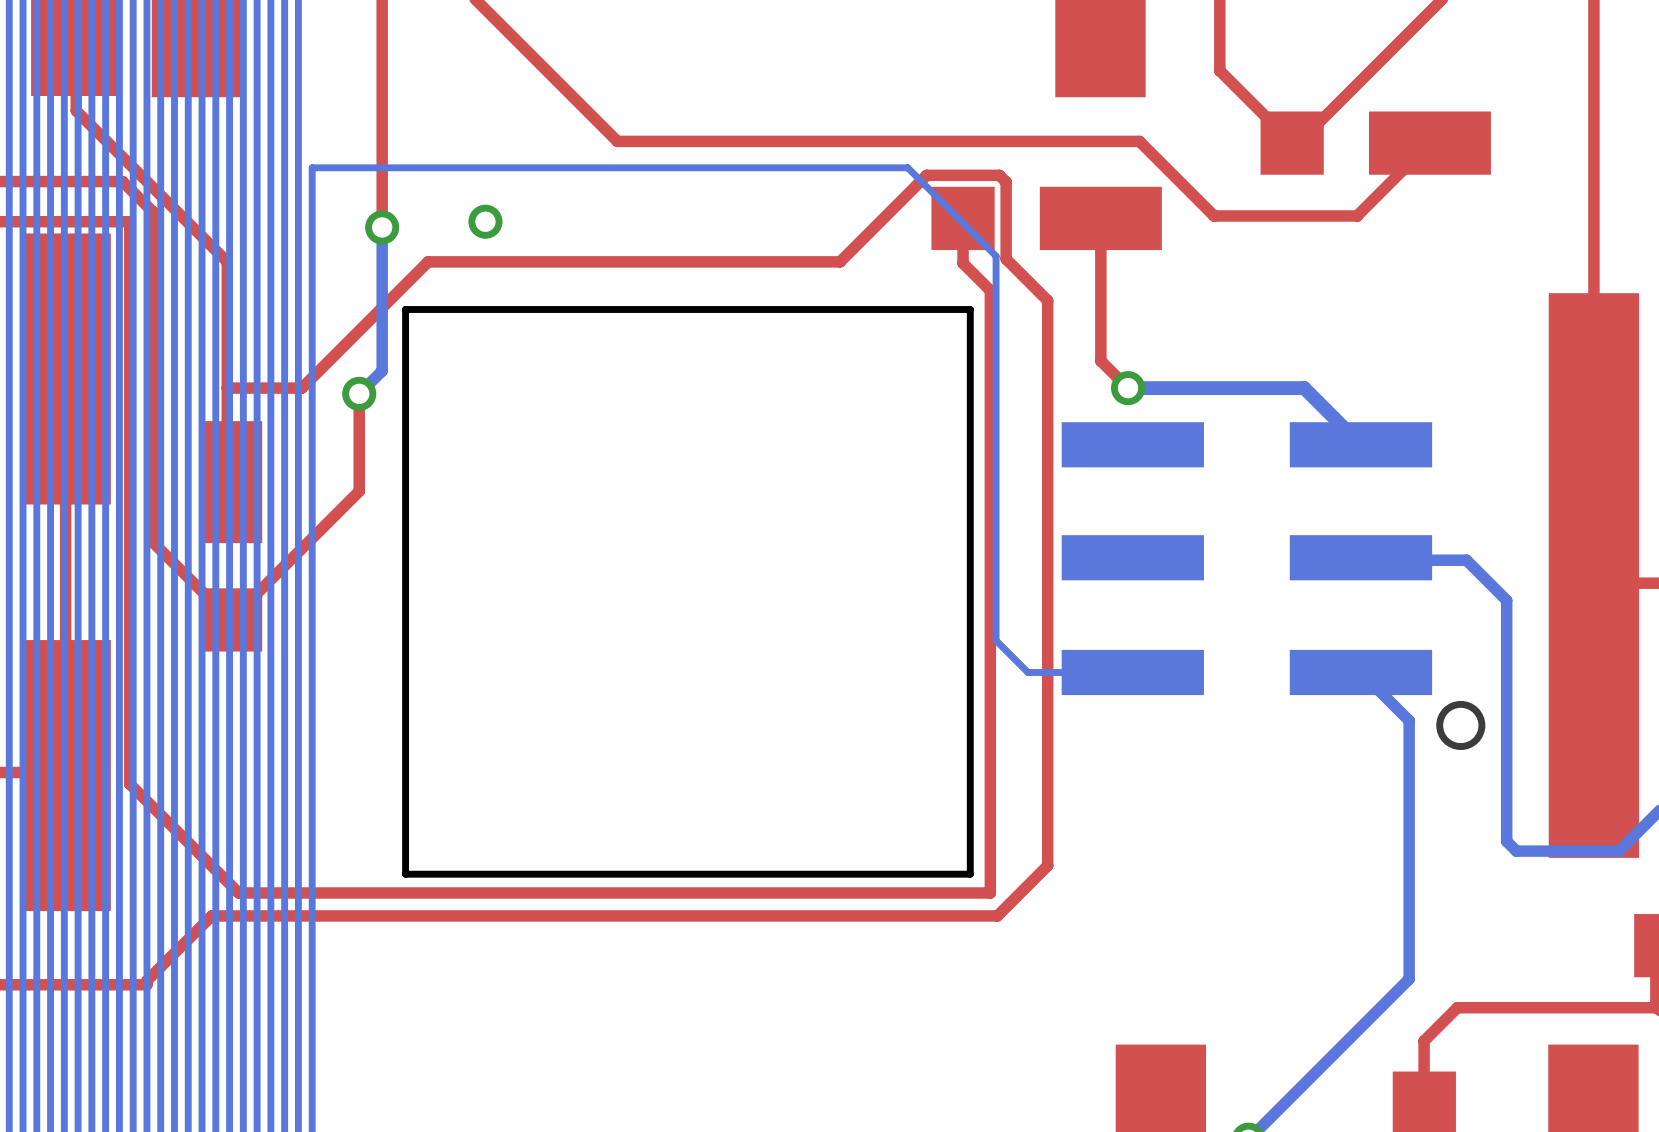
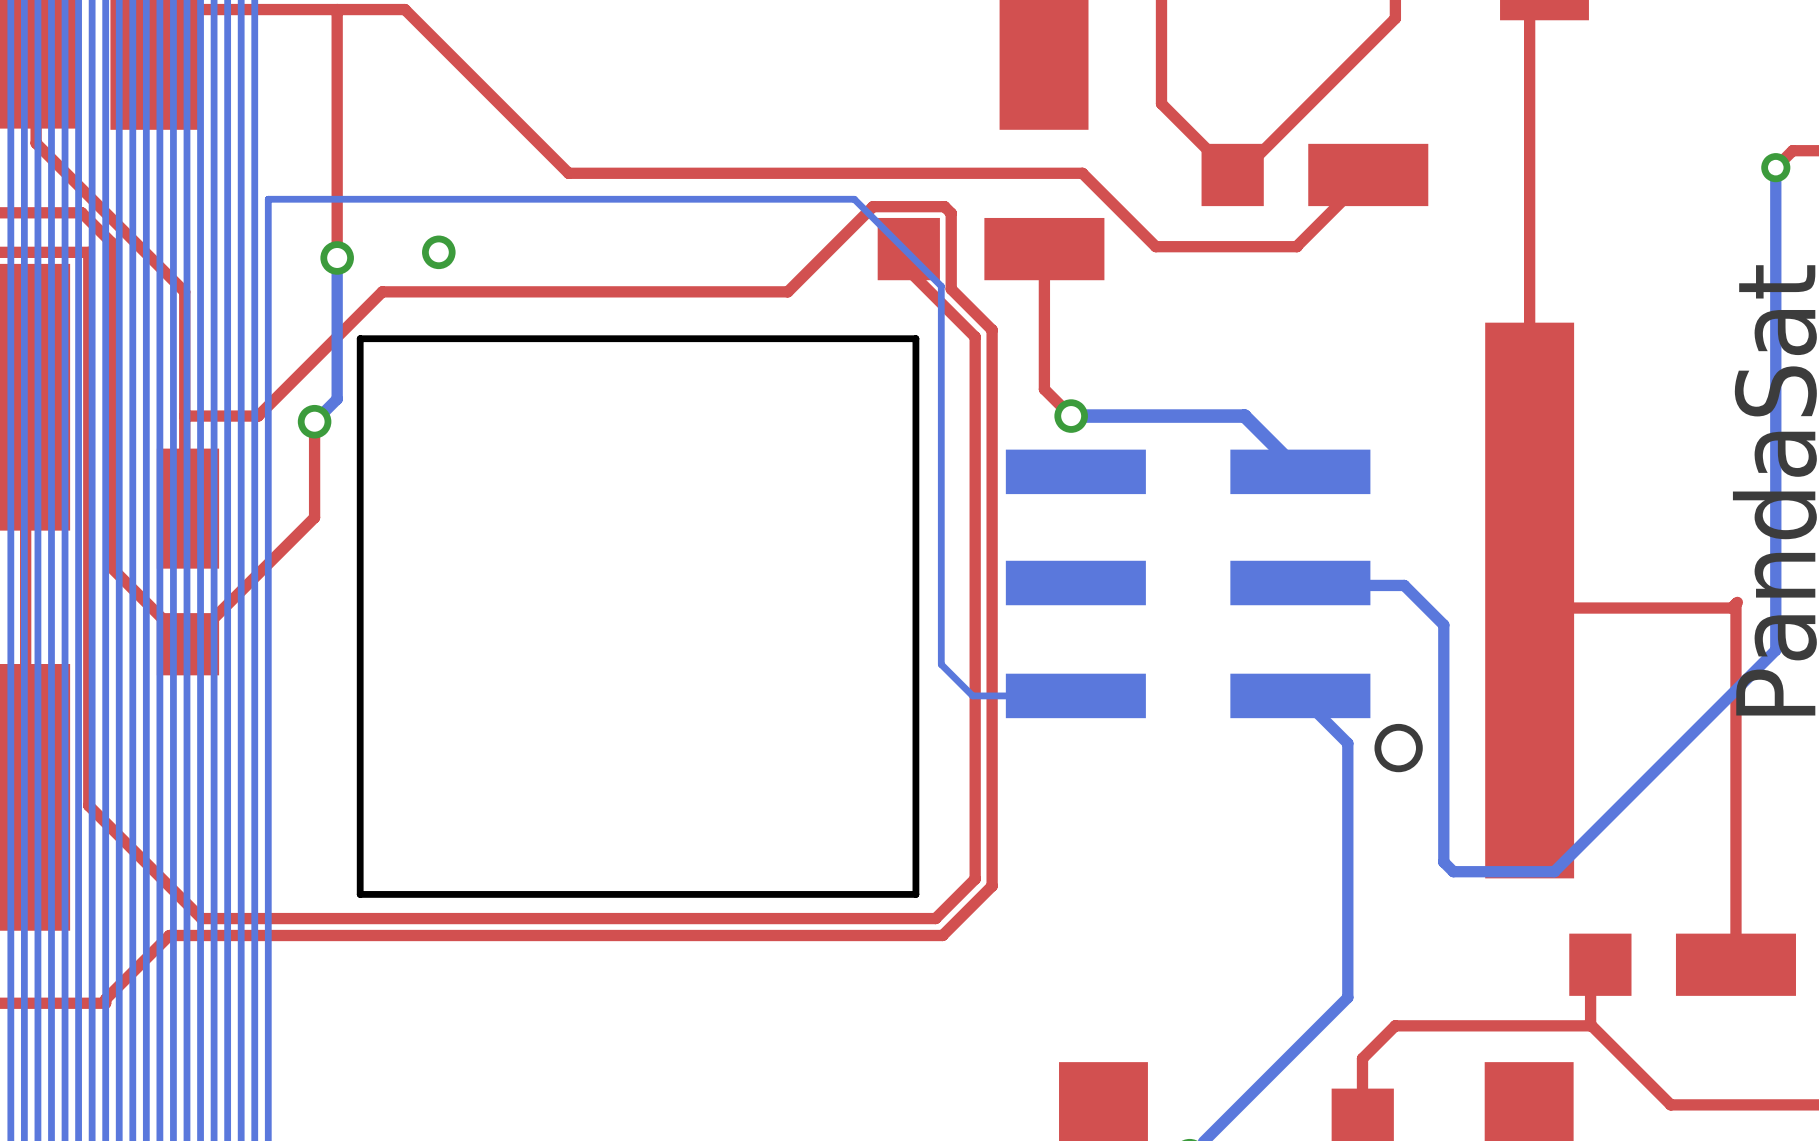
top track: (963, 240) (963, 263) (990, 290) (990, 892) (238, 892) -> (908, 270) (975, 337) (975, 879) (935, 918) (201, 918) (196, 912)

